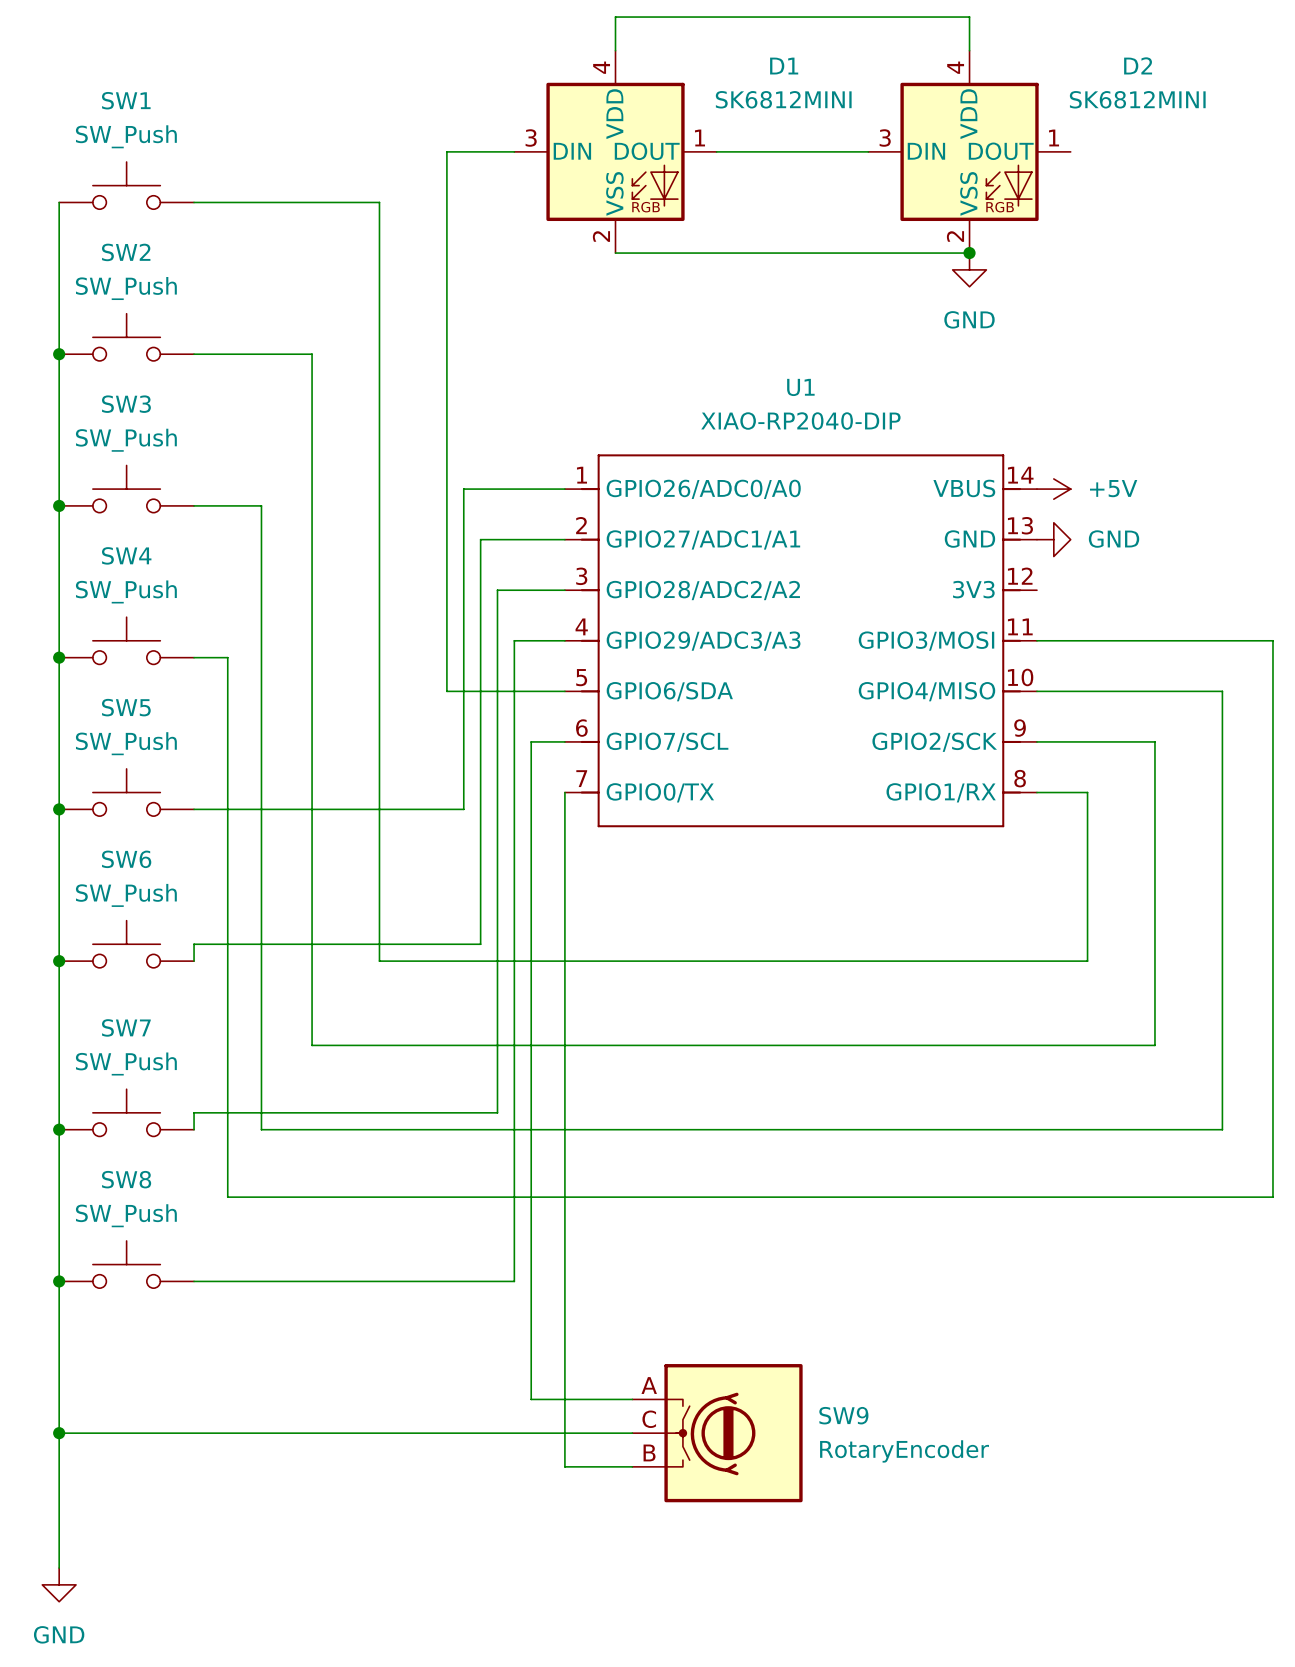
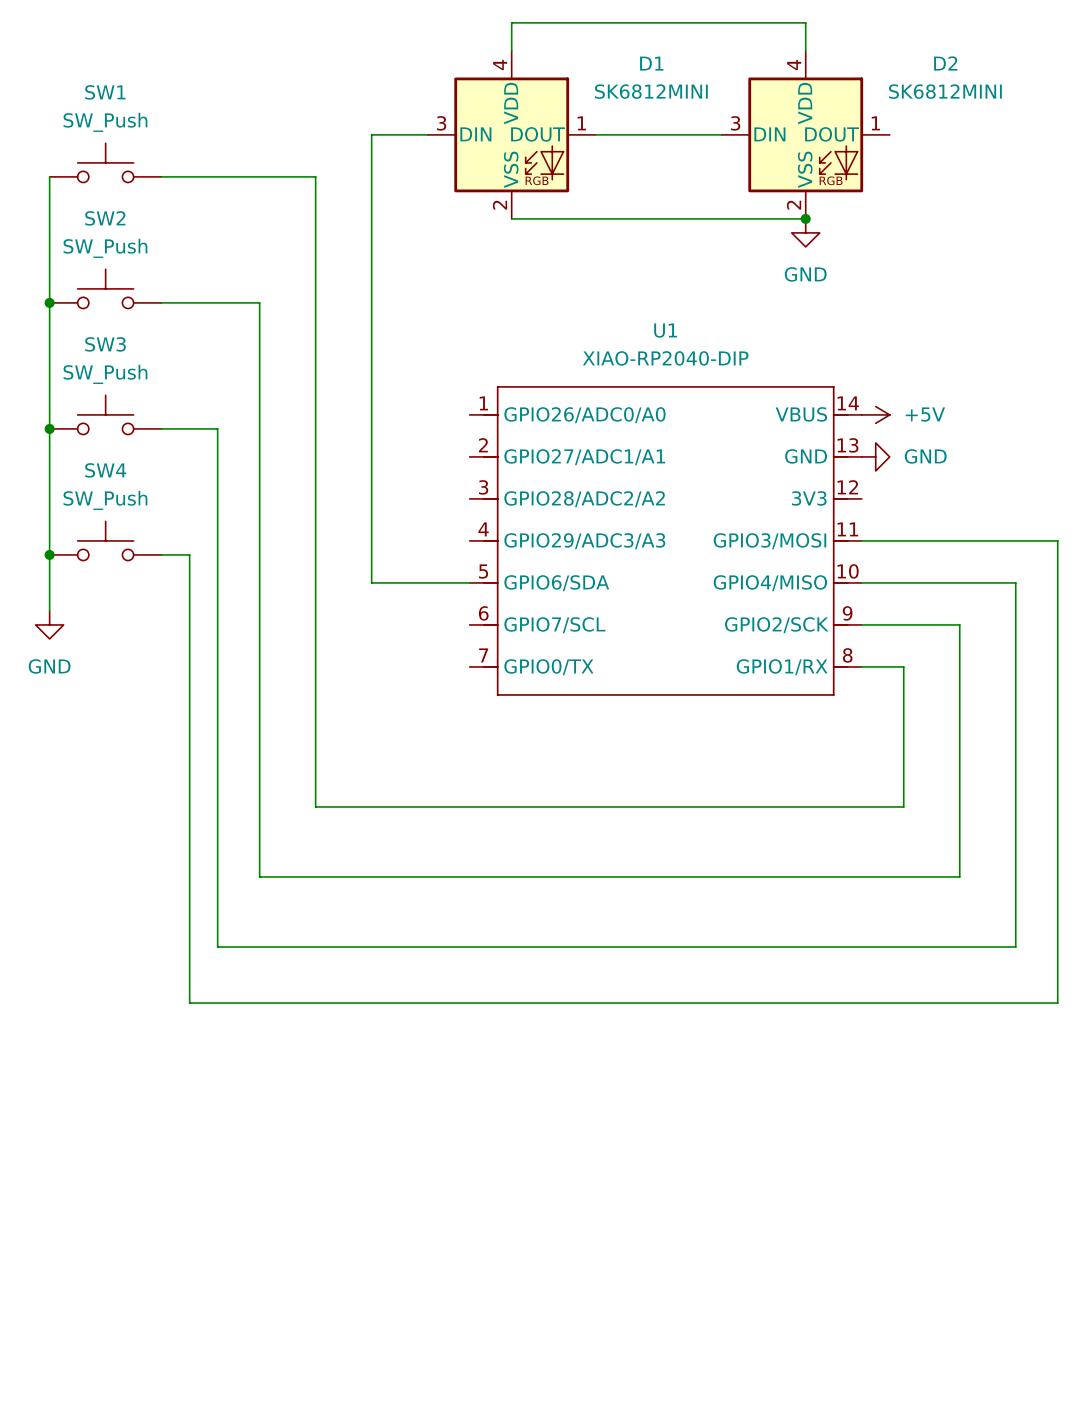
wire: (564, 489) (463, 489) (463, 809) (194, 809) -> none
wire: (564, 539) (480, 539) (480, 944) (194, 944) (194, 961) -> none
wire: (564, 590) (497, 590) (497, 1112) (194, 1112) (194, 1129) -> none
wire: (564, 640) (514, 640) (514, 1281) (194, 1281) -> none
wire: (59, 725) (59, 1568) -> none
power symbol: none -> GND (49, 624)
wire: (564, 741) (531, 741) (531, 1399) (632, 1399) -> none
SW5: SW_Push (126, 792) -> none
wire: (564, 792) (564, 1466) (632, 1466) -> none
junction: (59, 809) -> none
SW6: SW_Push (126, 944) -> none
junction: (59, 961) -> none
SW7: SW_Push (126, 1112) -> none
junction: (59, 1129) -> none
SW8: SW_Push (126, 1264) -> none
junction: (59, 1281) -> none
wire: (59, 1433) (632, 1433) -> none
junction: (59, 1433) -> none
SW9: RotaryEncoder (717, 1433) -> none
power symbol: GND (59, 1584) -> none

